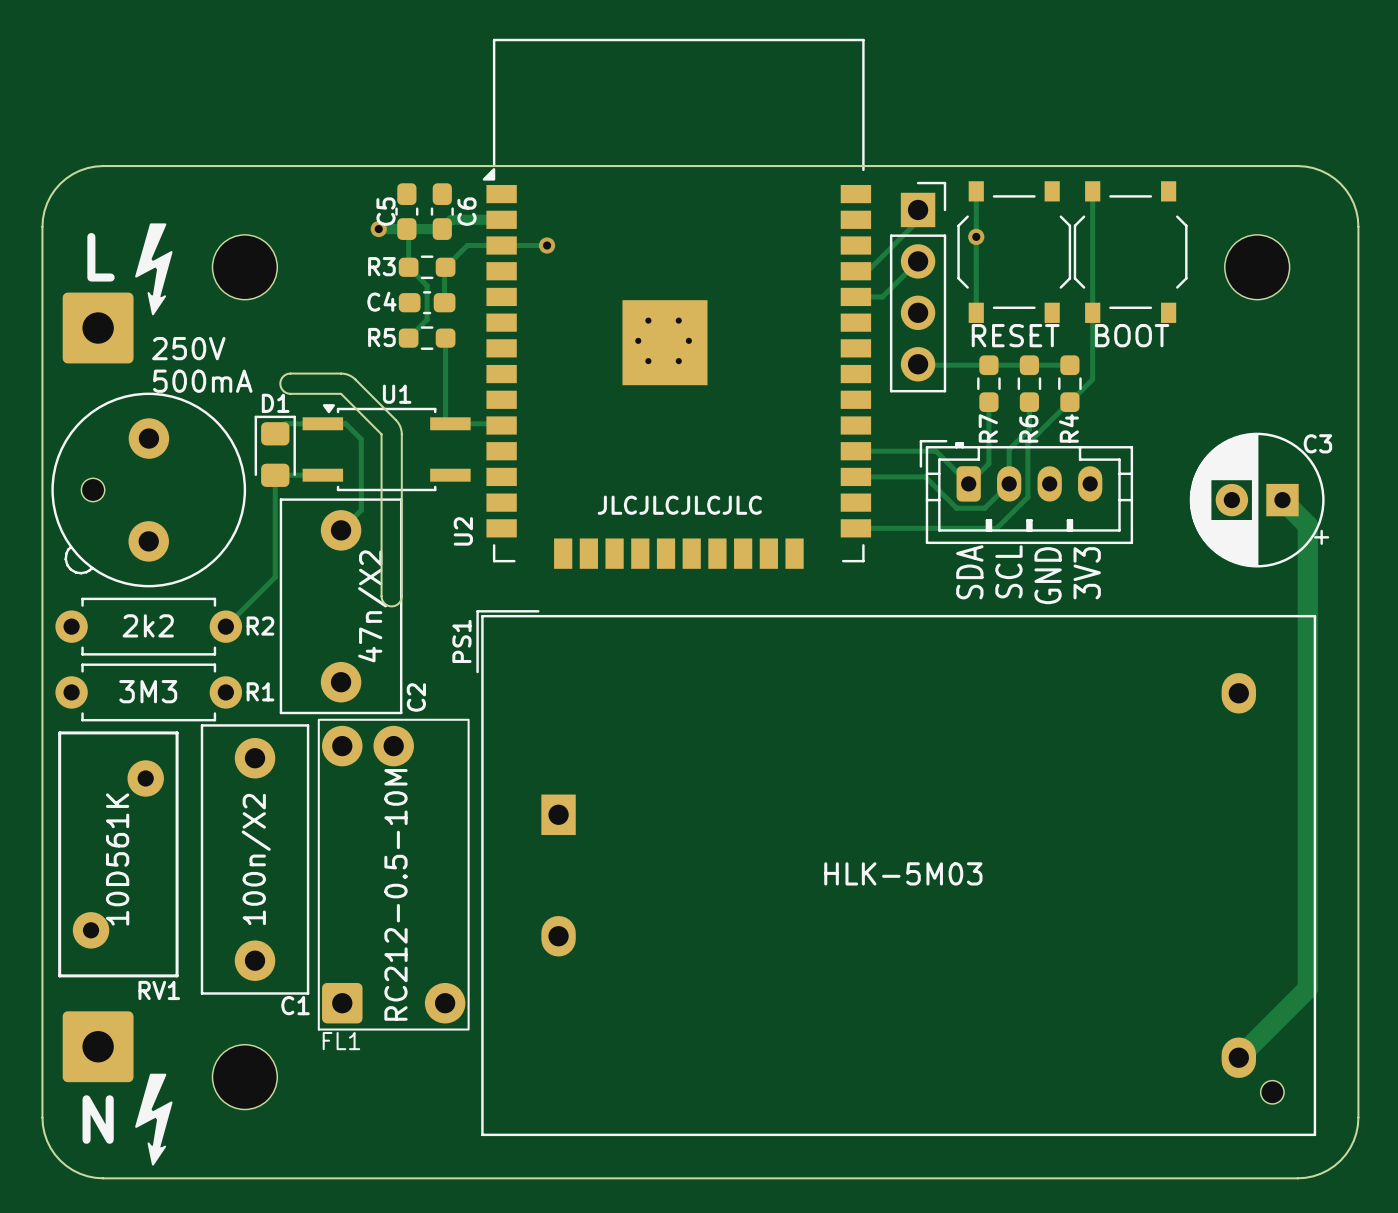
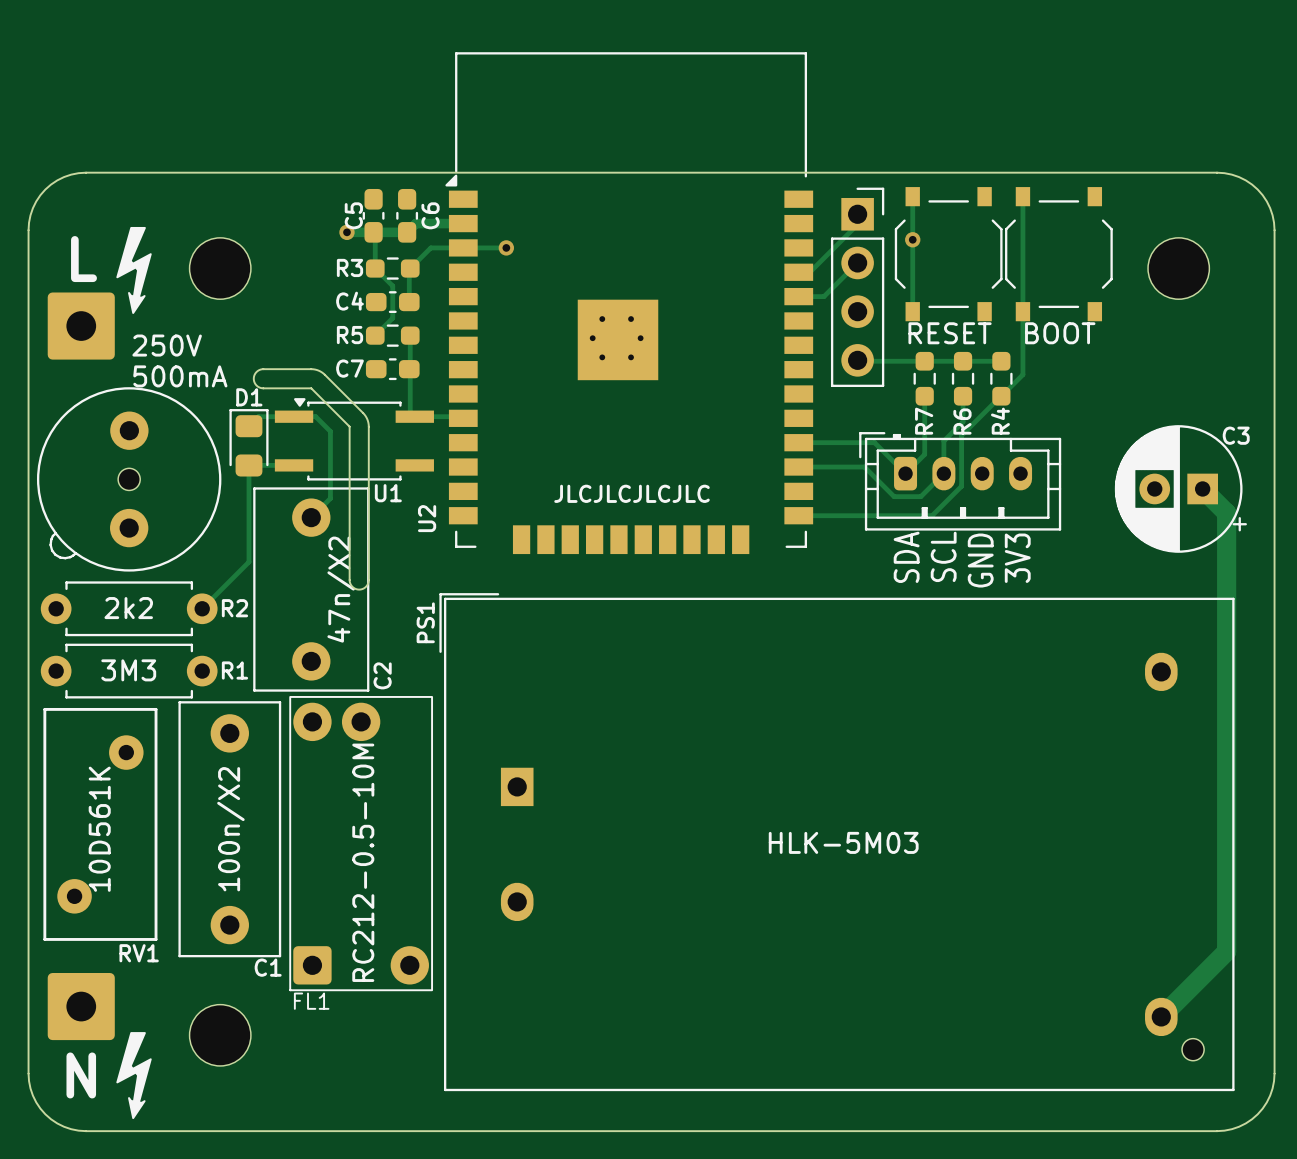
C7: none -> (392, 369)
U1 name position: U1 (397, 394) -> U1 (388, 493)
part position: (93, 489) -> (129, 479)

